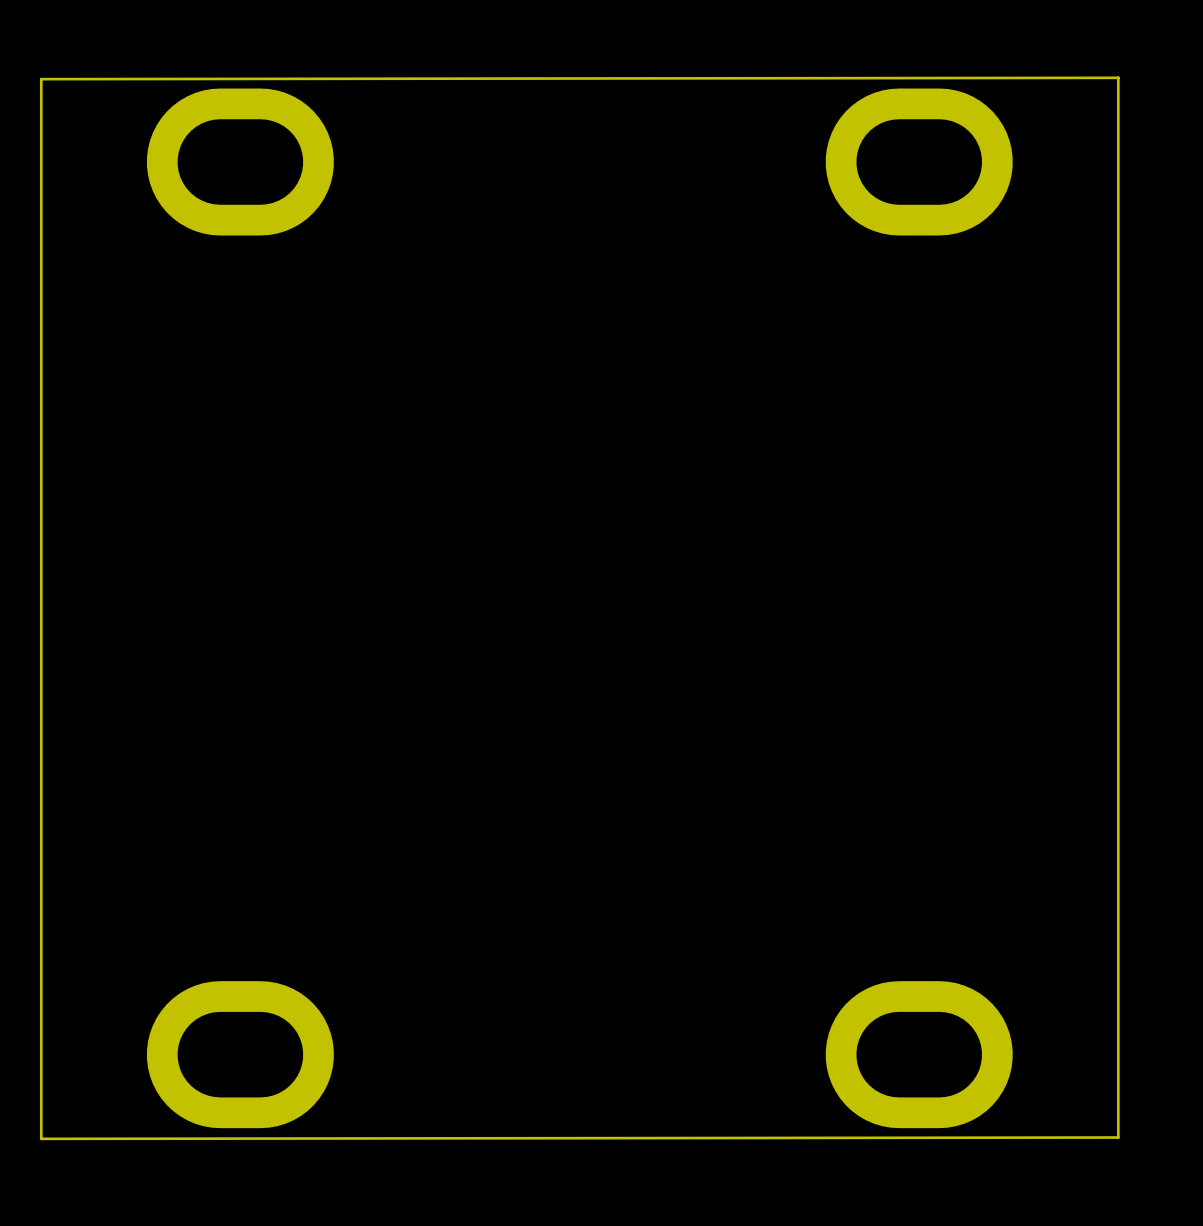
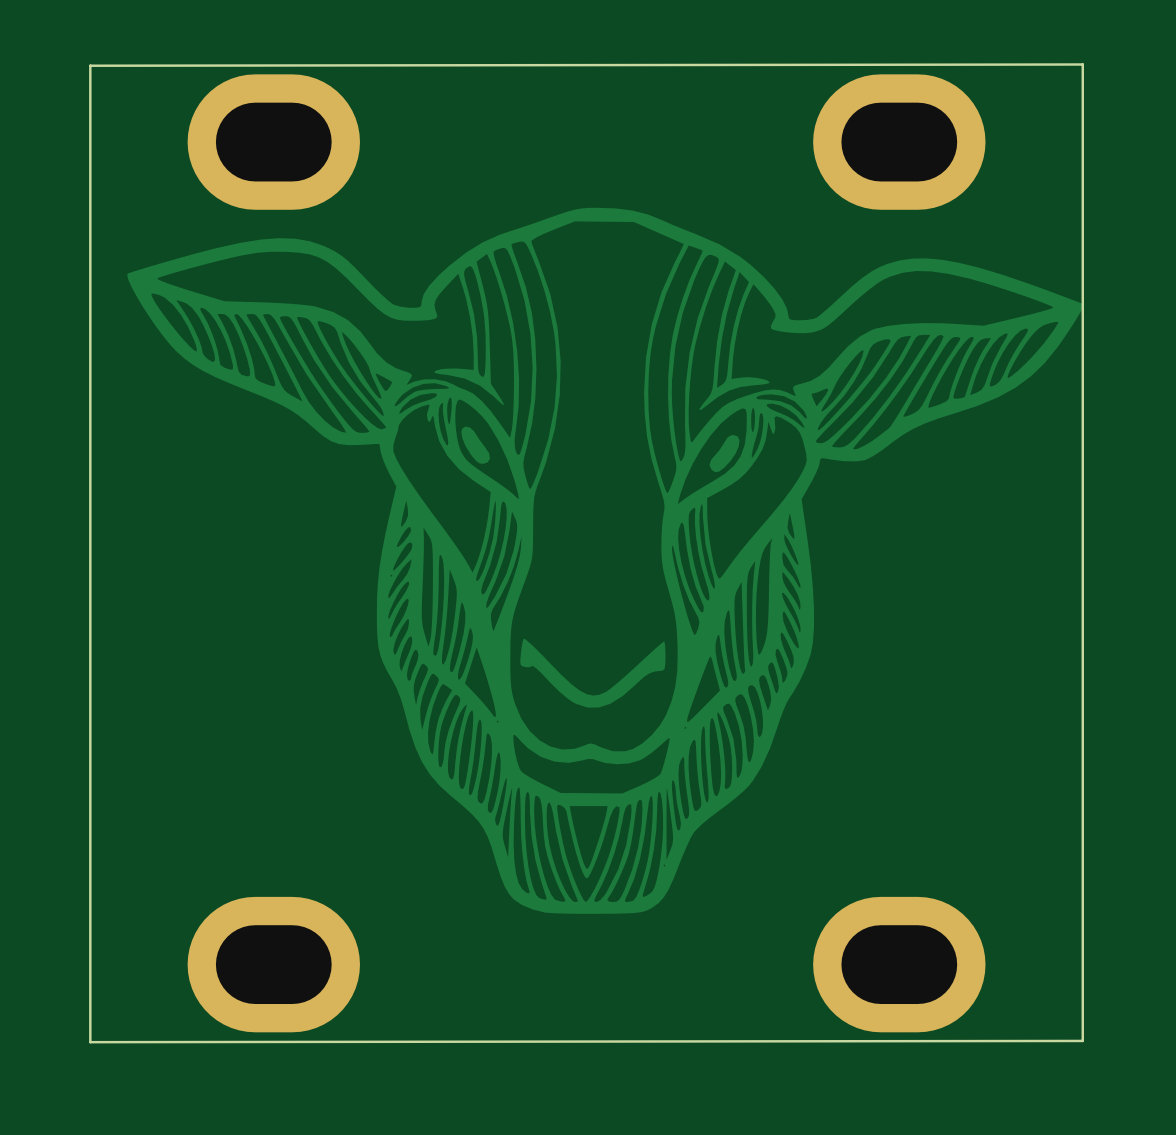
drawing: none -> [127, 207, 1085, 914]

